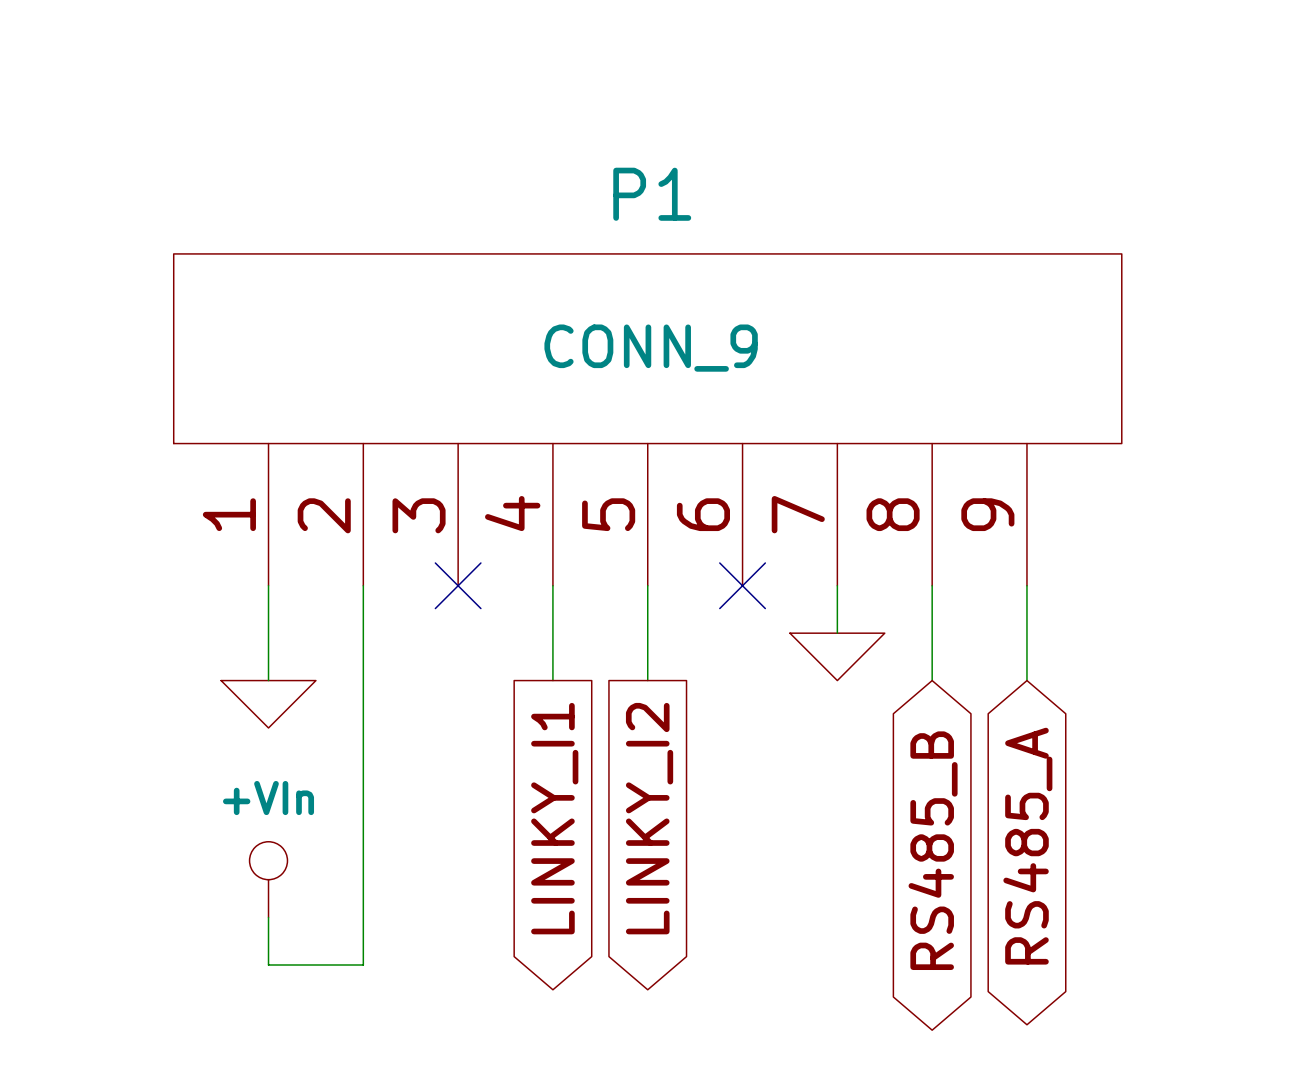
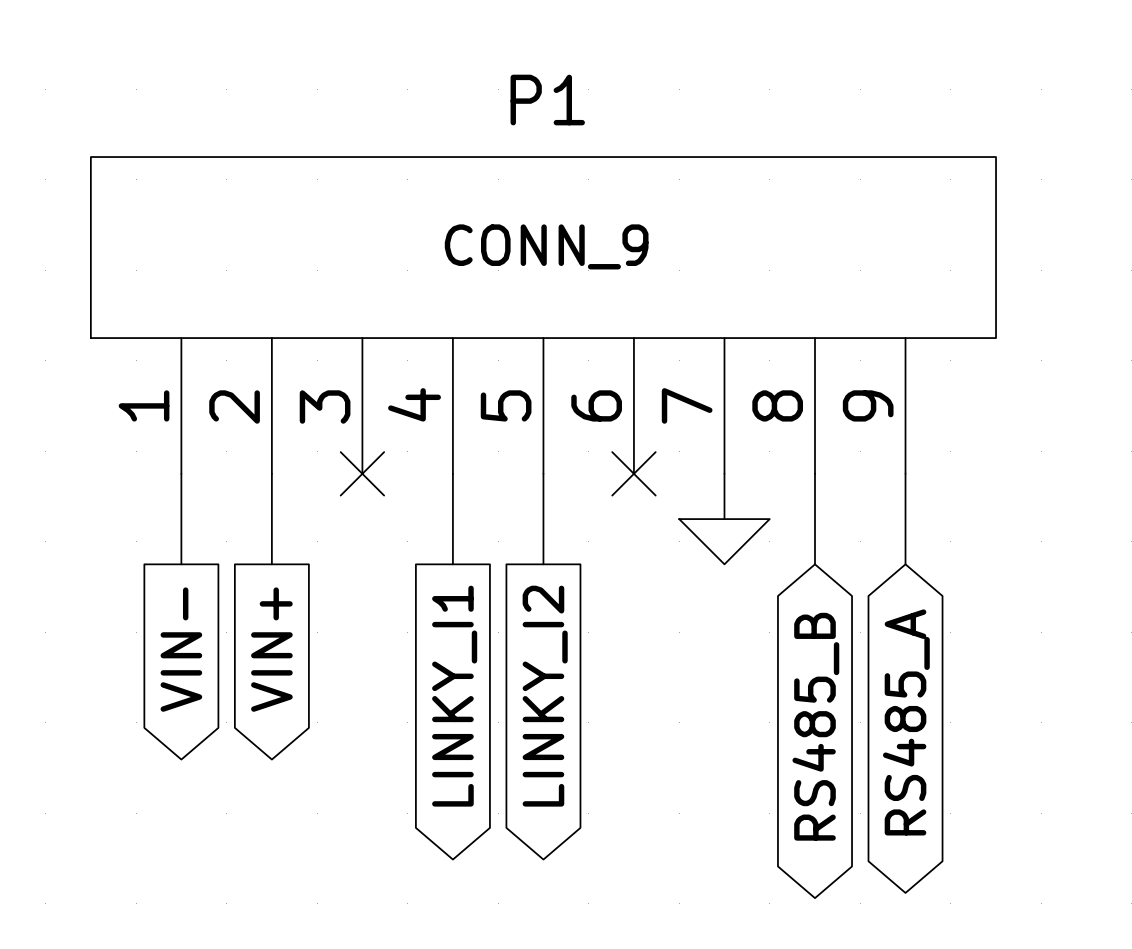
wire: (363, 680) (363, 965) (268, 965) (268, 917) -> none
power symbol: (268, 704) -> none
global label: none -> VIN- (181, 649)
global label: none -> VIN+ (271, 649)
power symbol: +VIn (268, 879) -> none

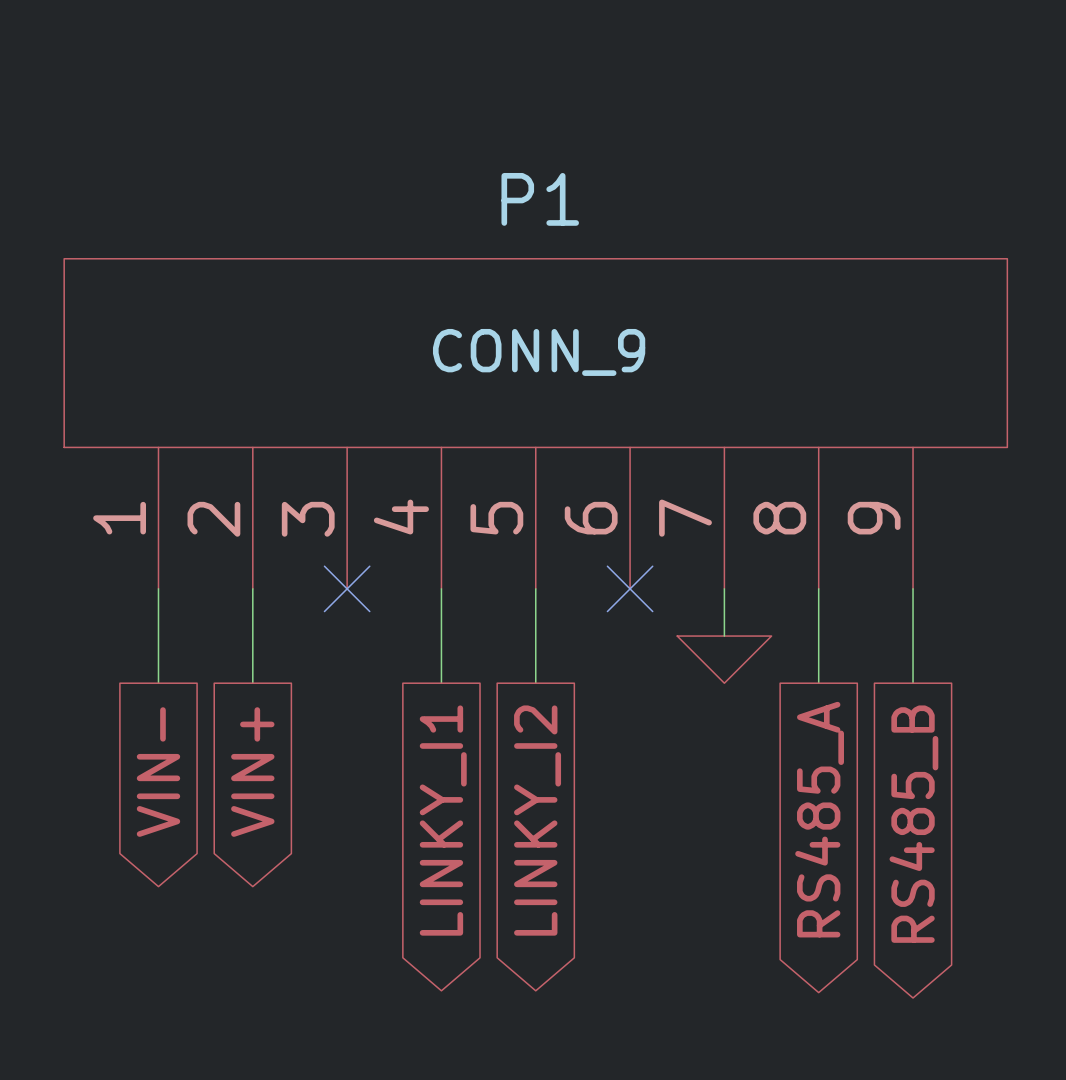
global label shape: bidirectional (906, 722) -> output (913, 824)
global label: RS485_A (906, 722) -> RS485_B (913, 824)
global label shape: bidirectional (815, 726) -> output (819, 819)
global label: RS485_B (815, 726) -> RS485_A (819, 819)

